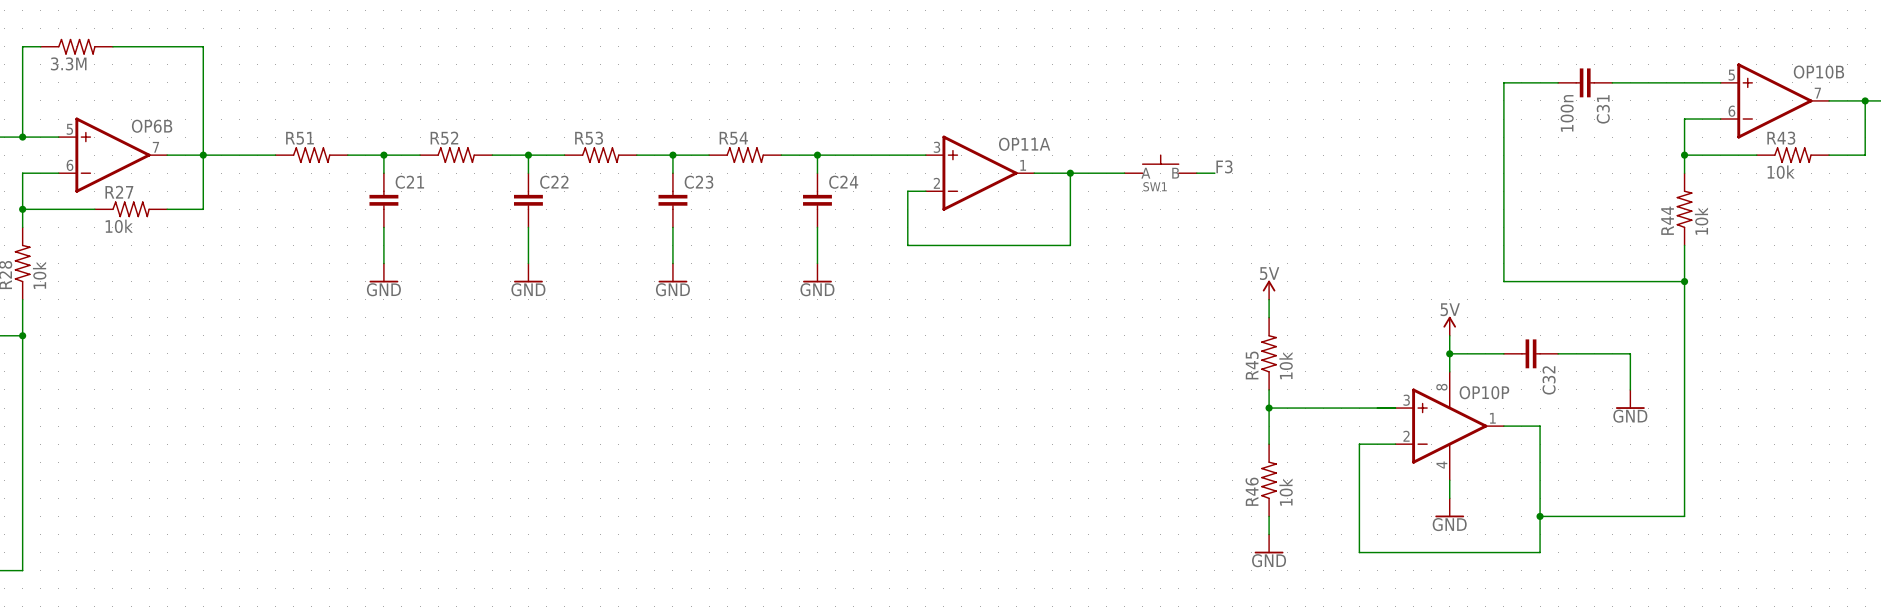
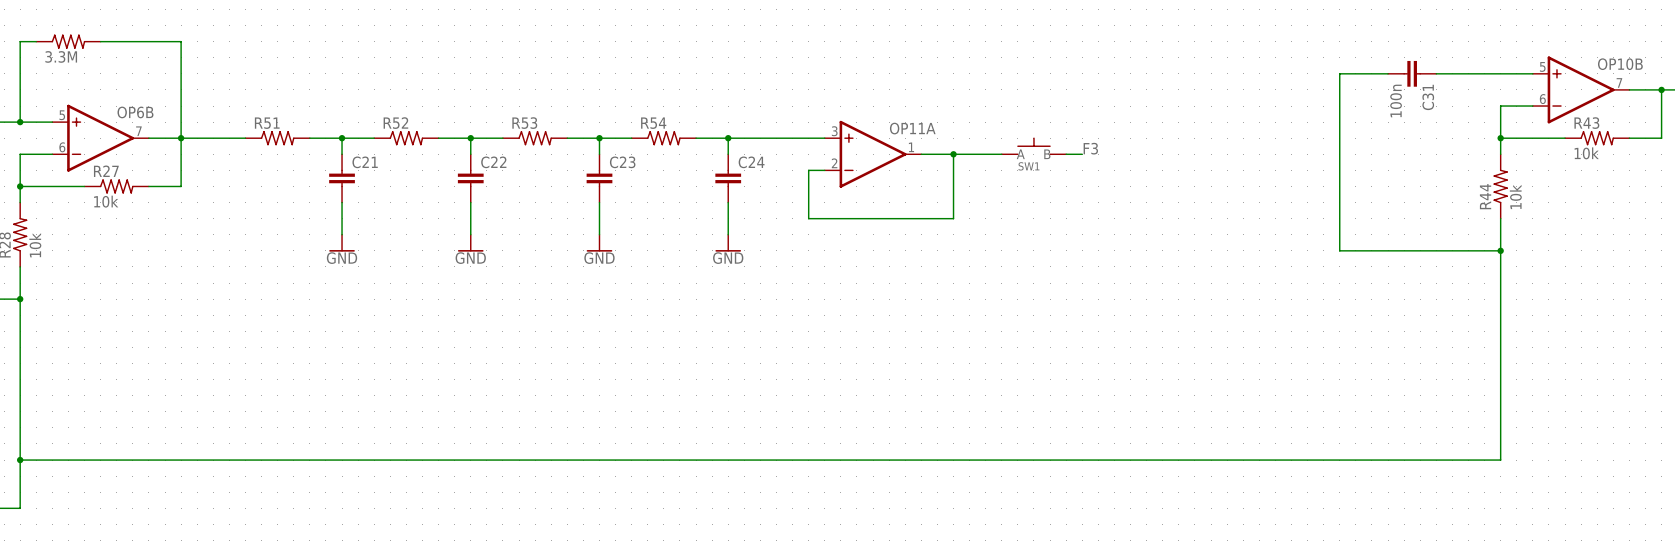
power symbol: 5V (1269, 290) -> none
wire: (1269, 299) (1269, 317) -> none
power symbol: 5V (1449, 326) -> none
wire: (1449, 335) (1449, 371) -> none
R45: 10k (1269, 353) -> none
wire: (1449, 353) (1503, 353) -> none
junction: (1449, 353) -> none
C32: (1531, 353) -> none
wire: (1558, 353) (1630, 353) (1630, 389) -> none
wire: (1269, 389) (1269, 444) -> none
power symbol: GND (1630, 399) -> none
wire: (1269, 408) (1395, 408) -> none
junction: (1269, 408) -> none
OP10P: (1449, 426) -> none
part: (1449, 426) -> none
wire: (1503, 426) (1540, 426) (1540, 552) (1359, 552) (1359, 444) (1395, 444) -> none
R46: 10k (1269, 480) -> none
wire: (1449, 480) (1449, 498) -> none
power symbol: GND (1449, 507) -> none
wire: none -> (20, 460) (1371, 460)
junction: none -> (20, 460)
wire: (1269, 516) (1269, 534) -> none
junction: (1540, 516) -> none
power symbol: GND (1269, 543) -> none

